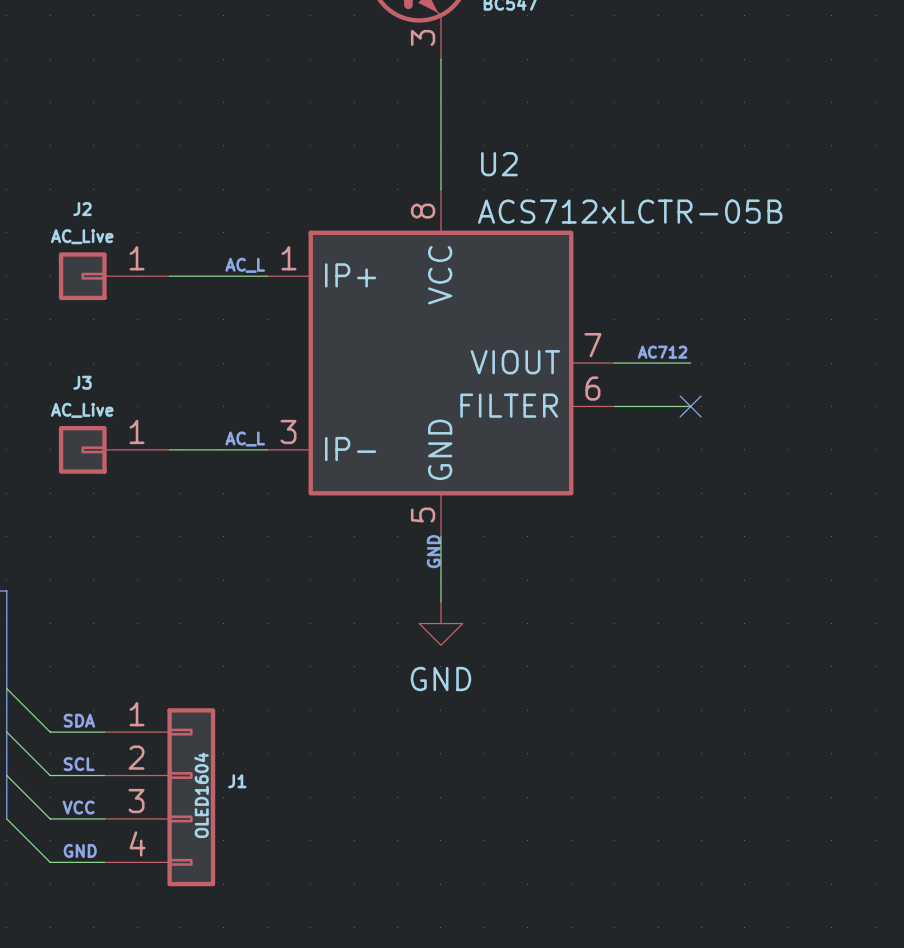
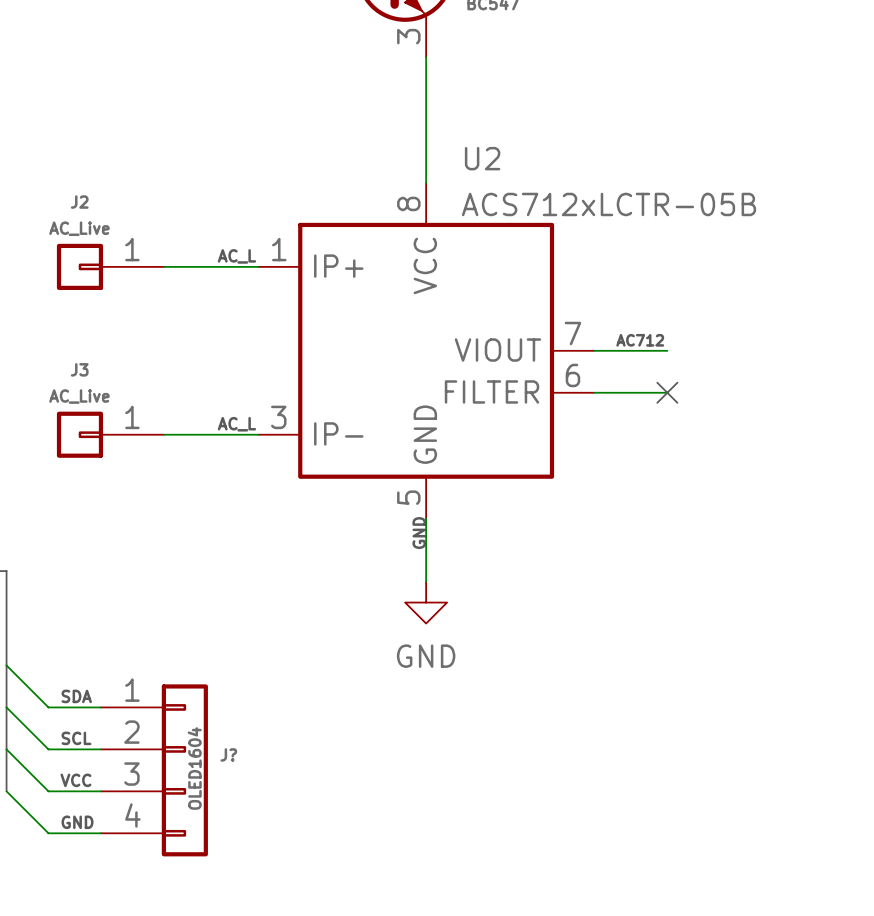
J1 name: J1 (237, 781) -> J? (228, 754)

